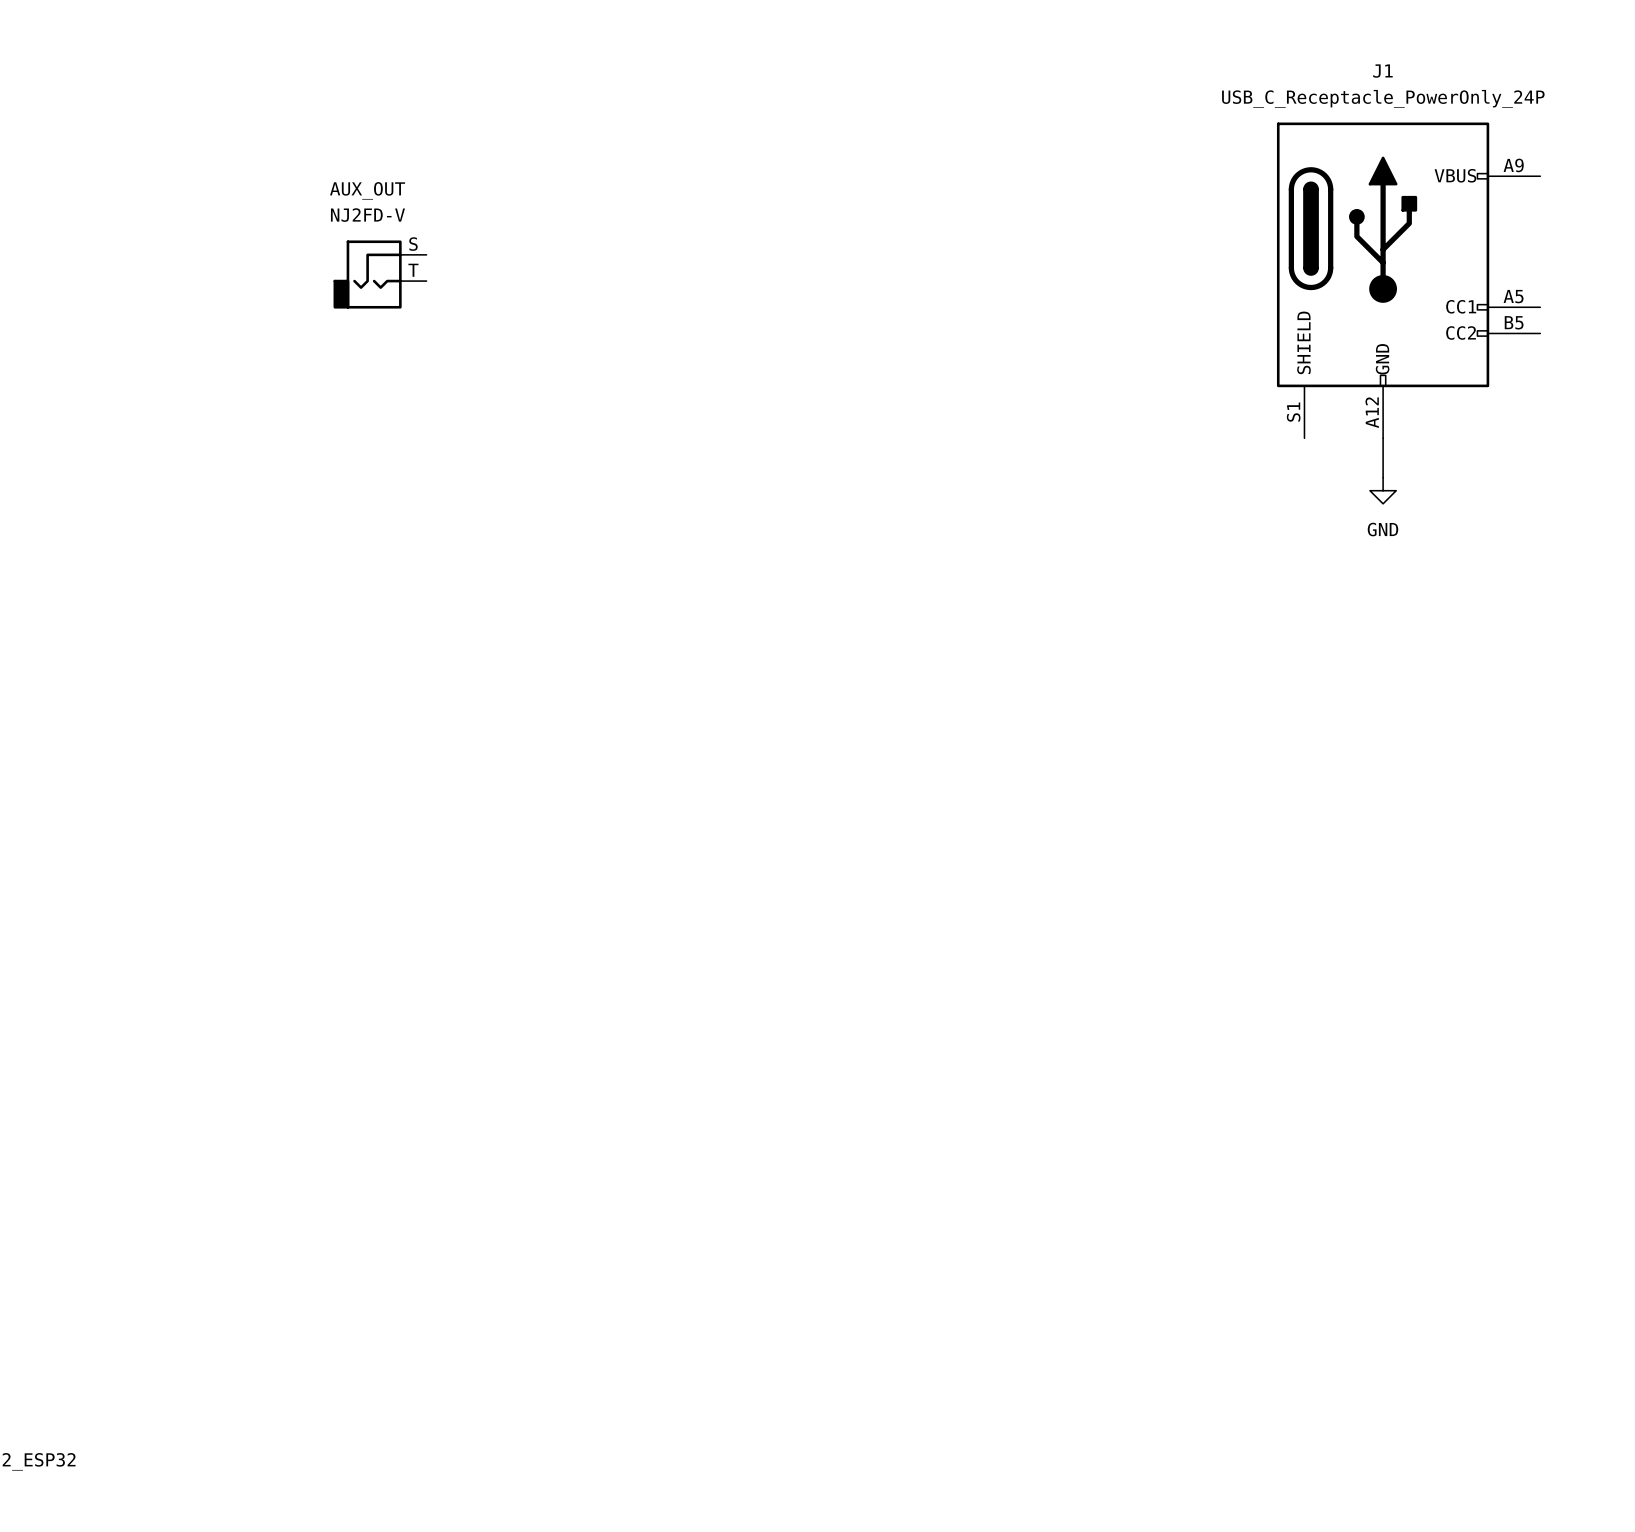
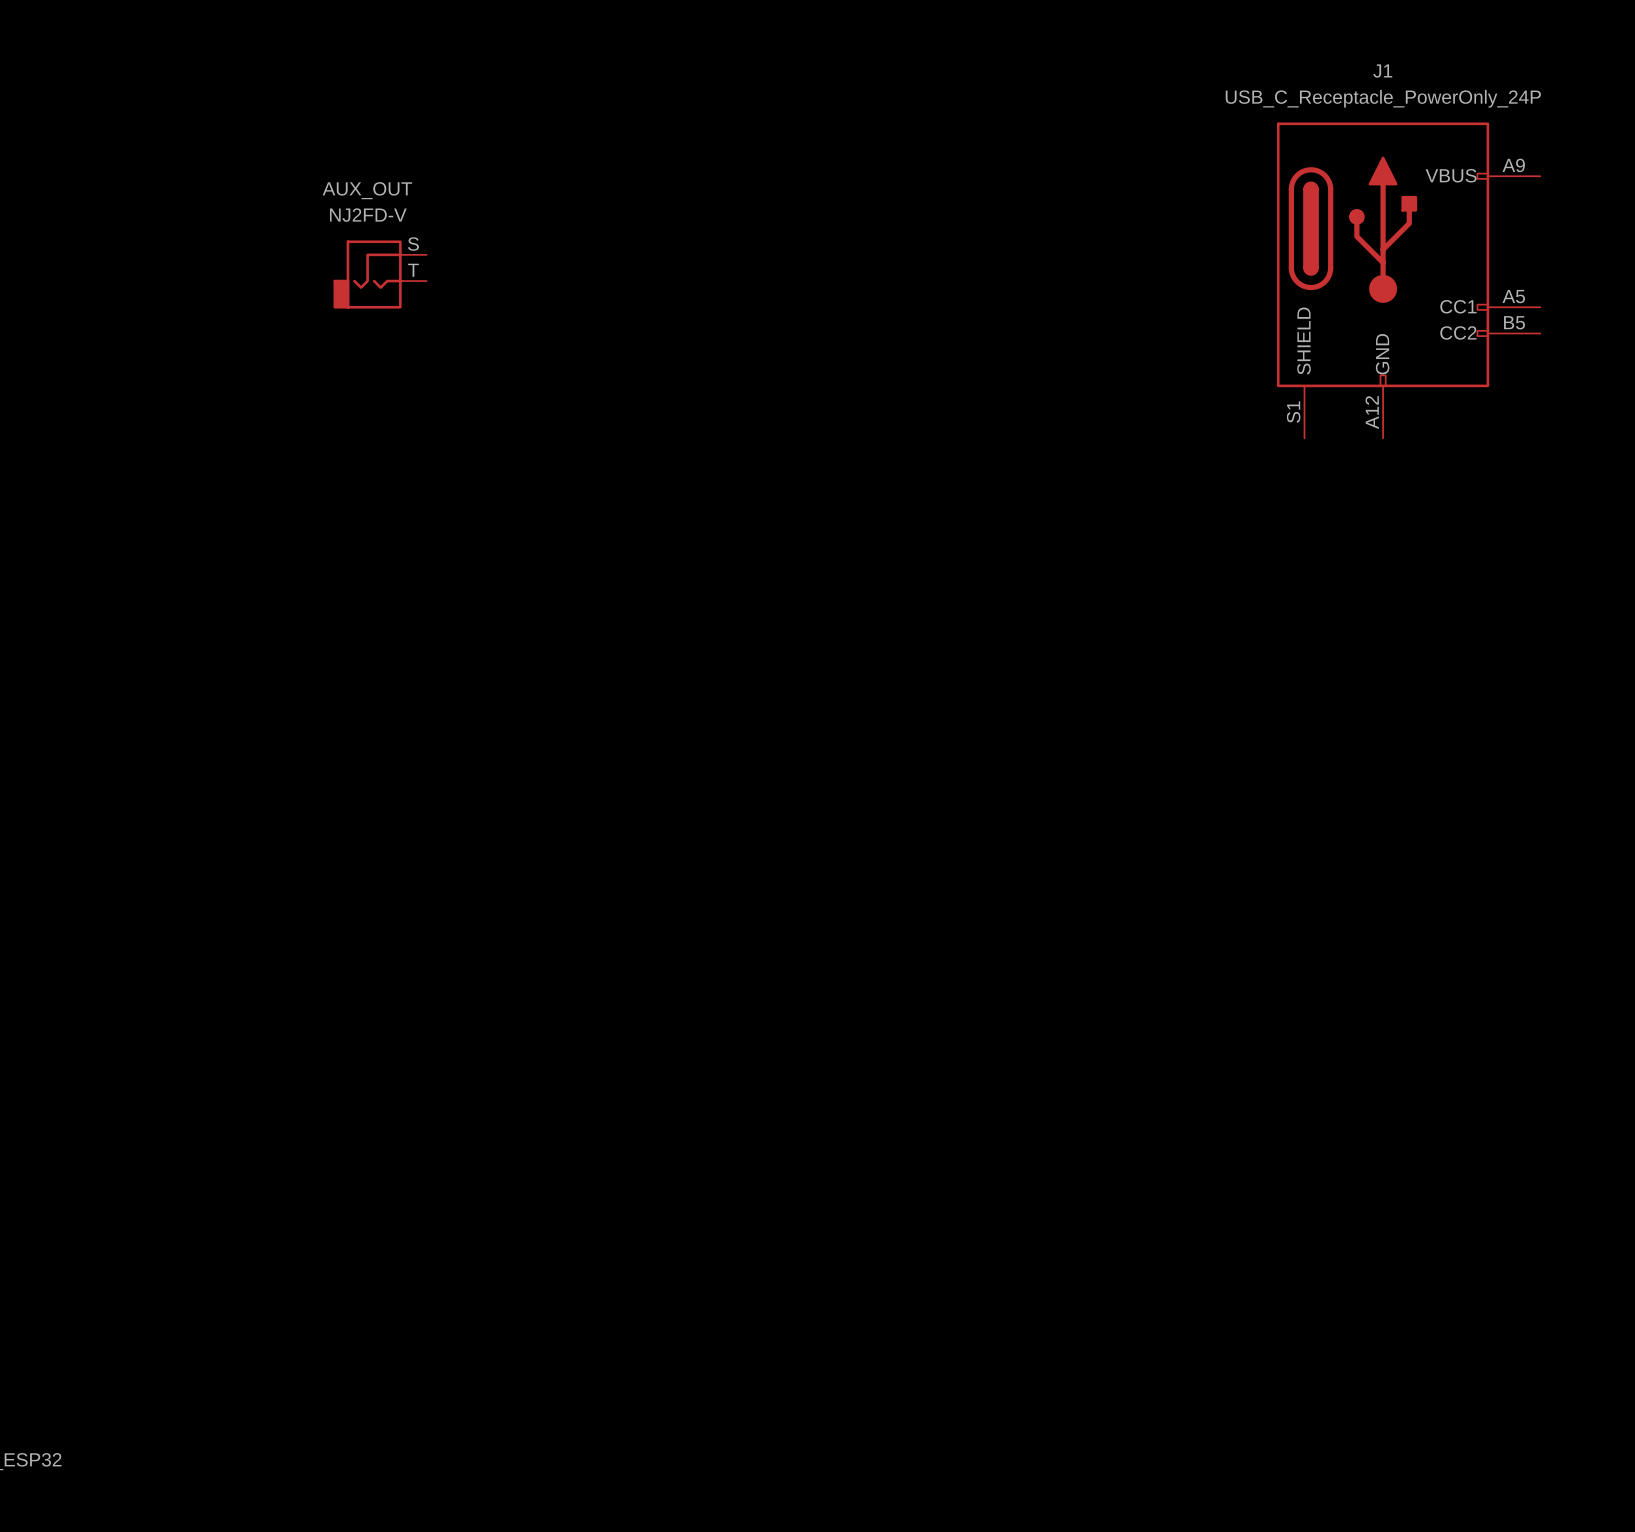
wire: (1383, 438) (1383, 477) -> none
power symbol: GND (1383, 490) -> none

